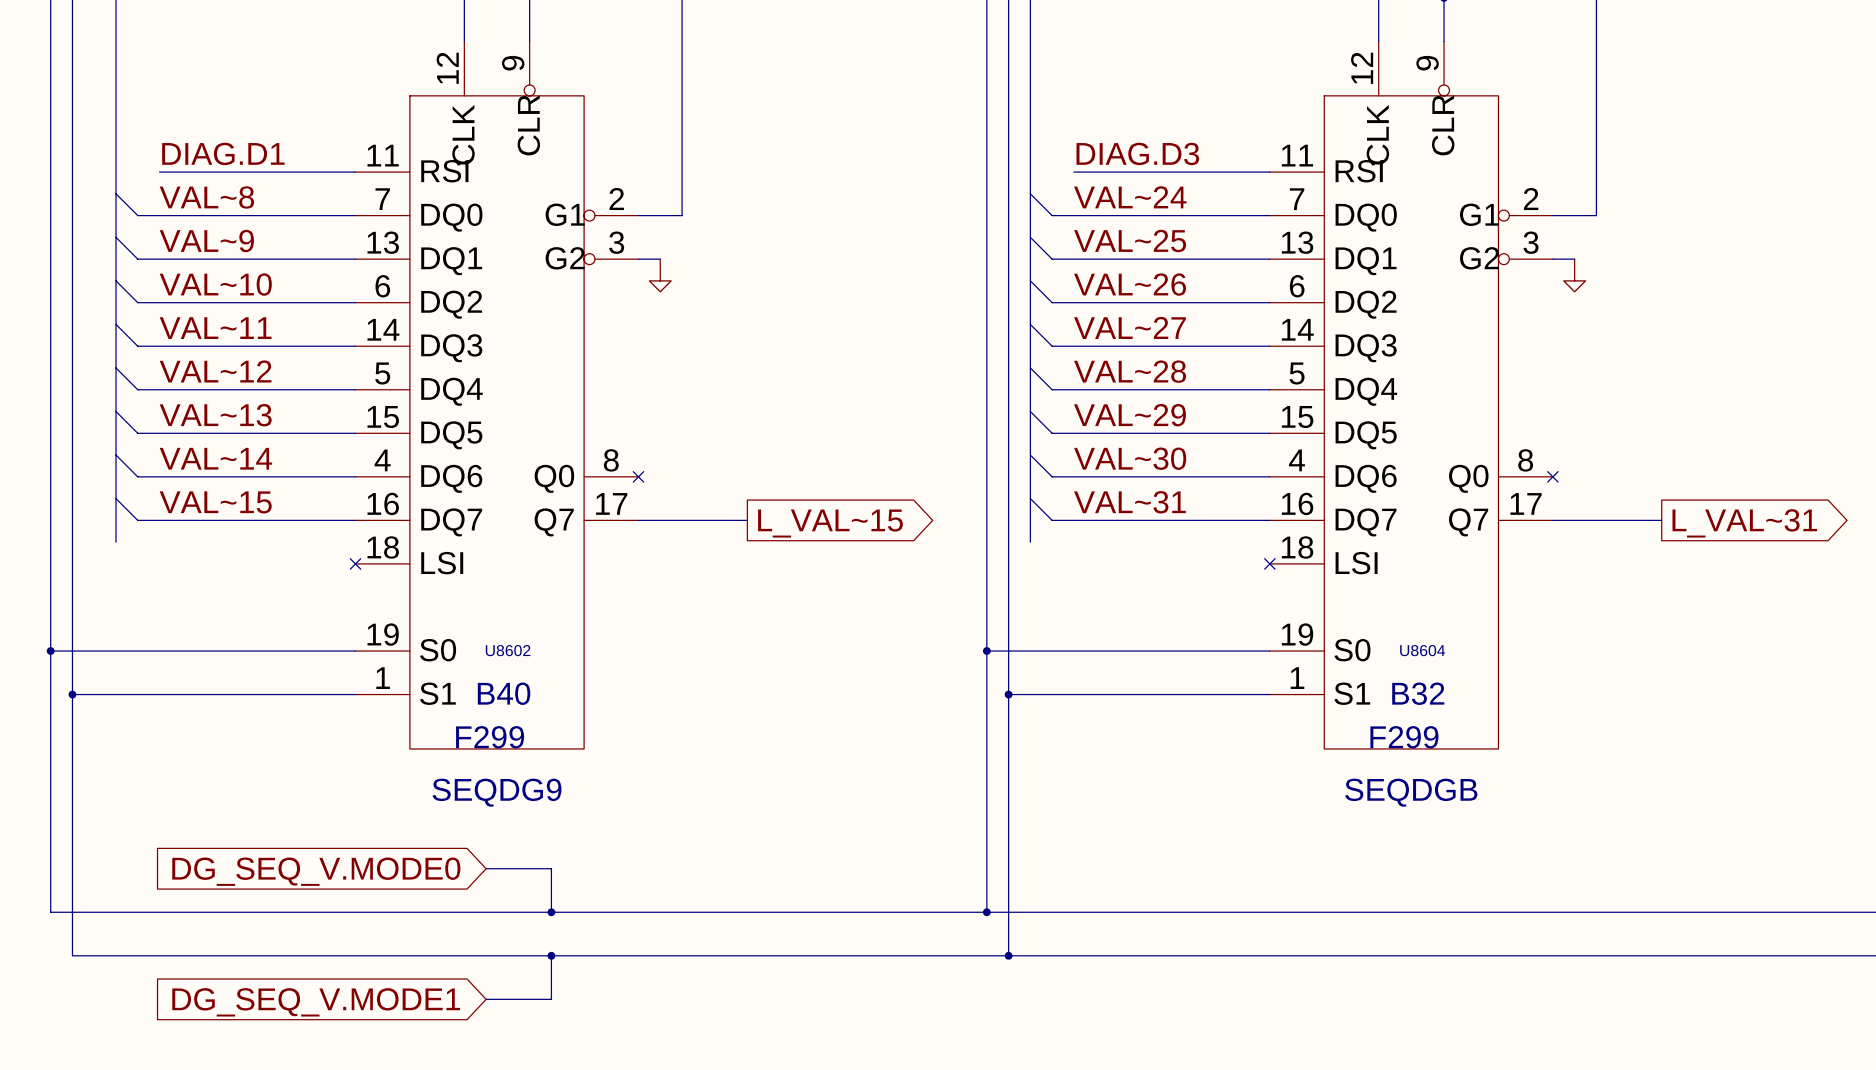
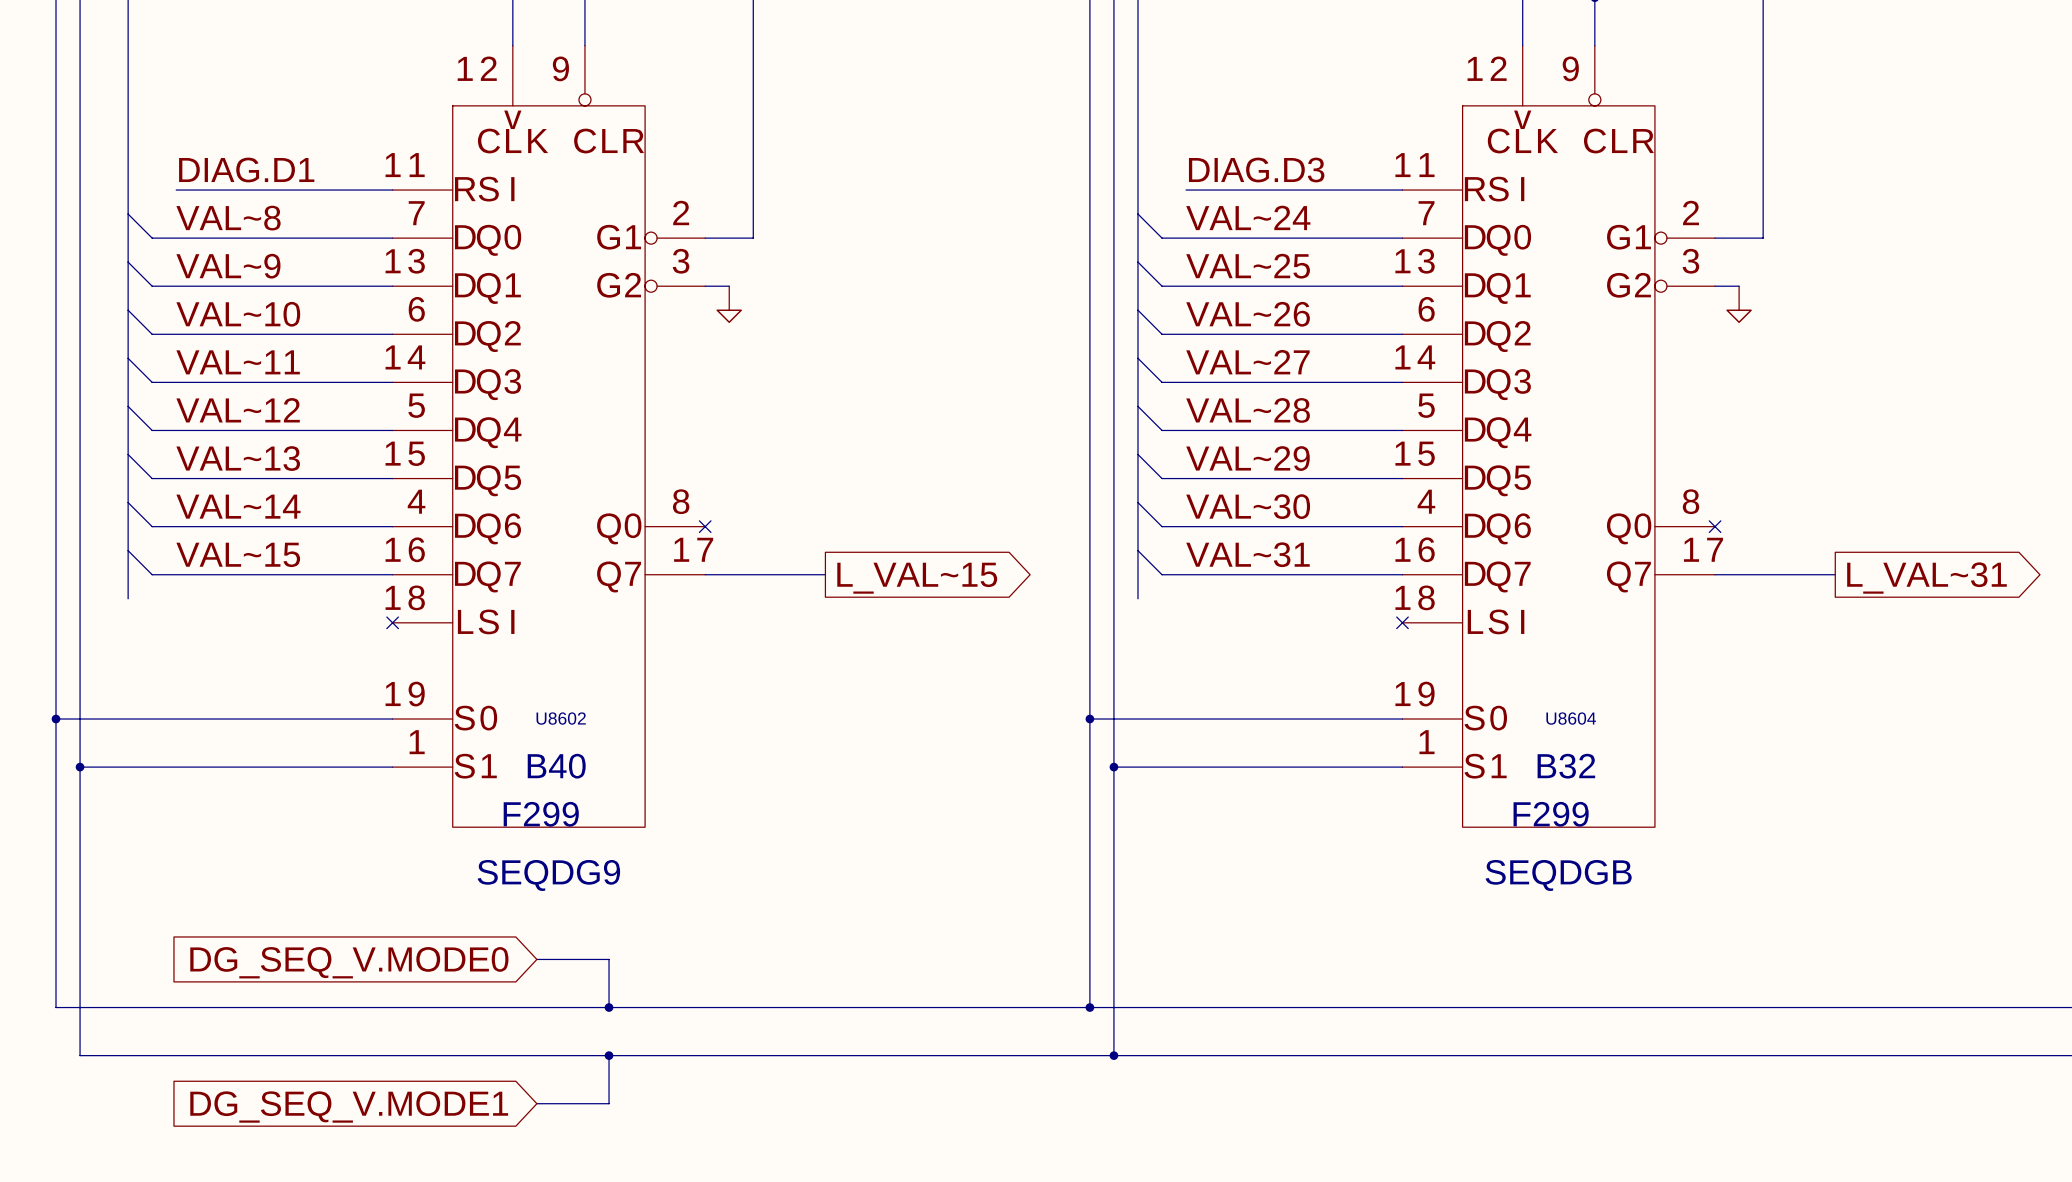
U8602 symbol: [355, 41, 639, 749] -> [392, 45, 706, 828]
U8604 symbol: [1269, 41, 1553, 749] -> [1402, 45, 1716, 828]

